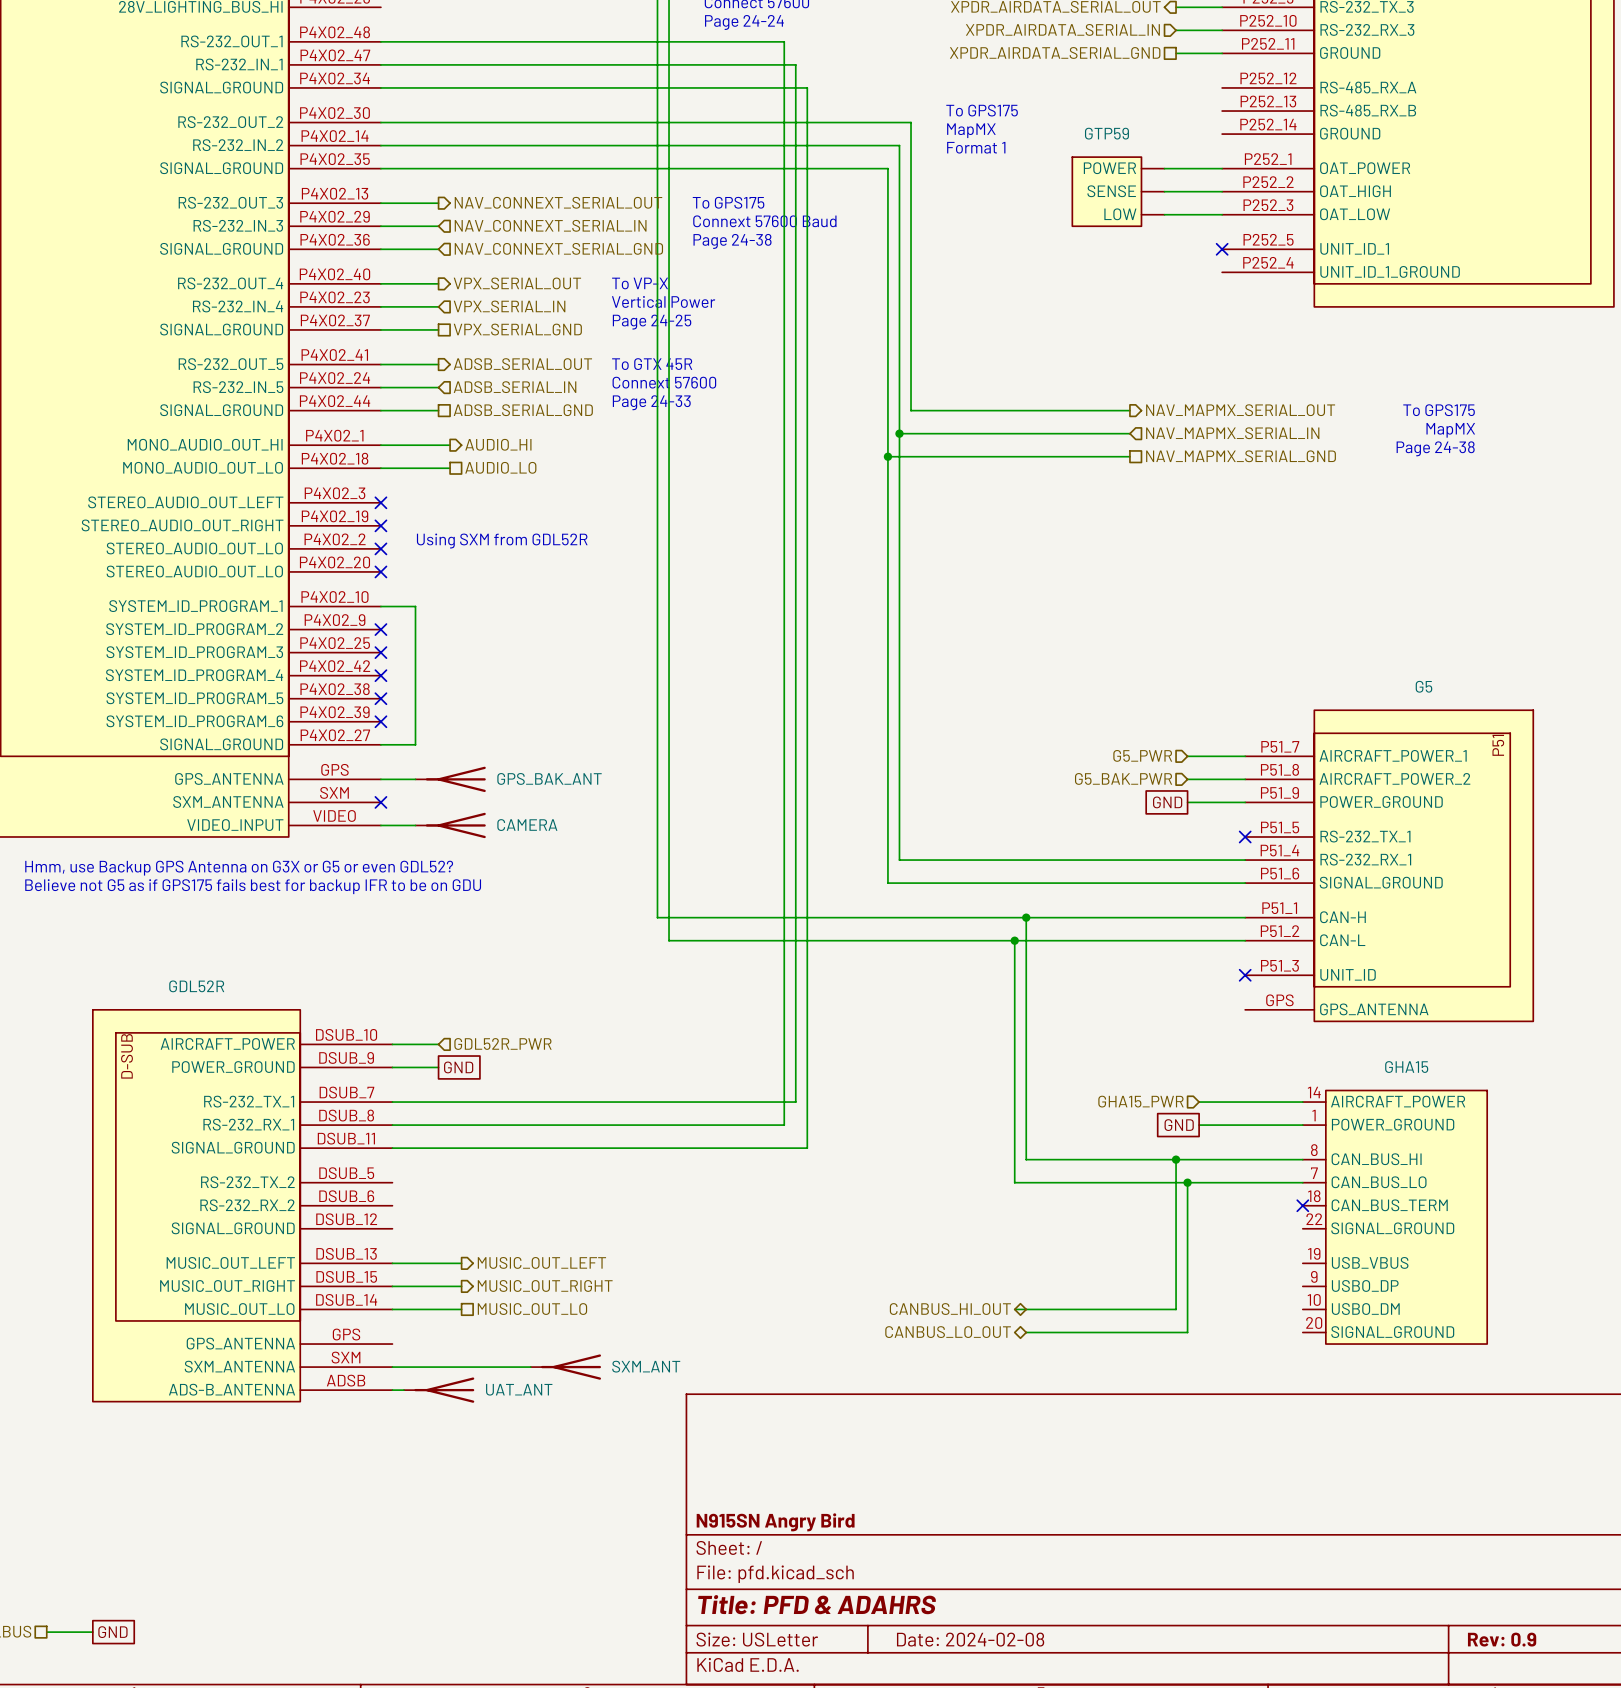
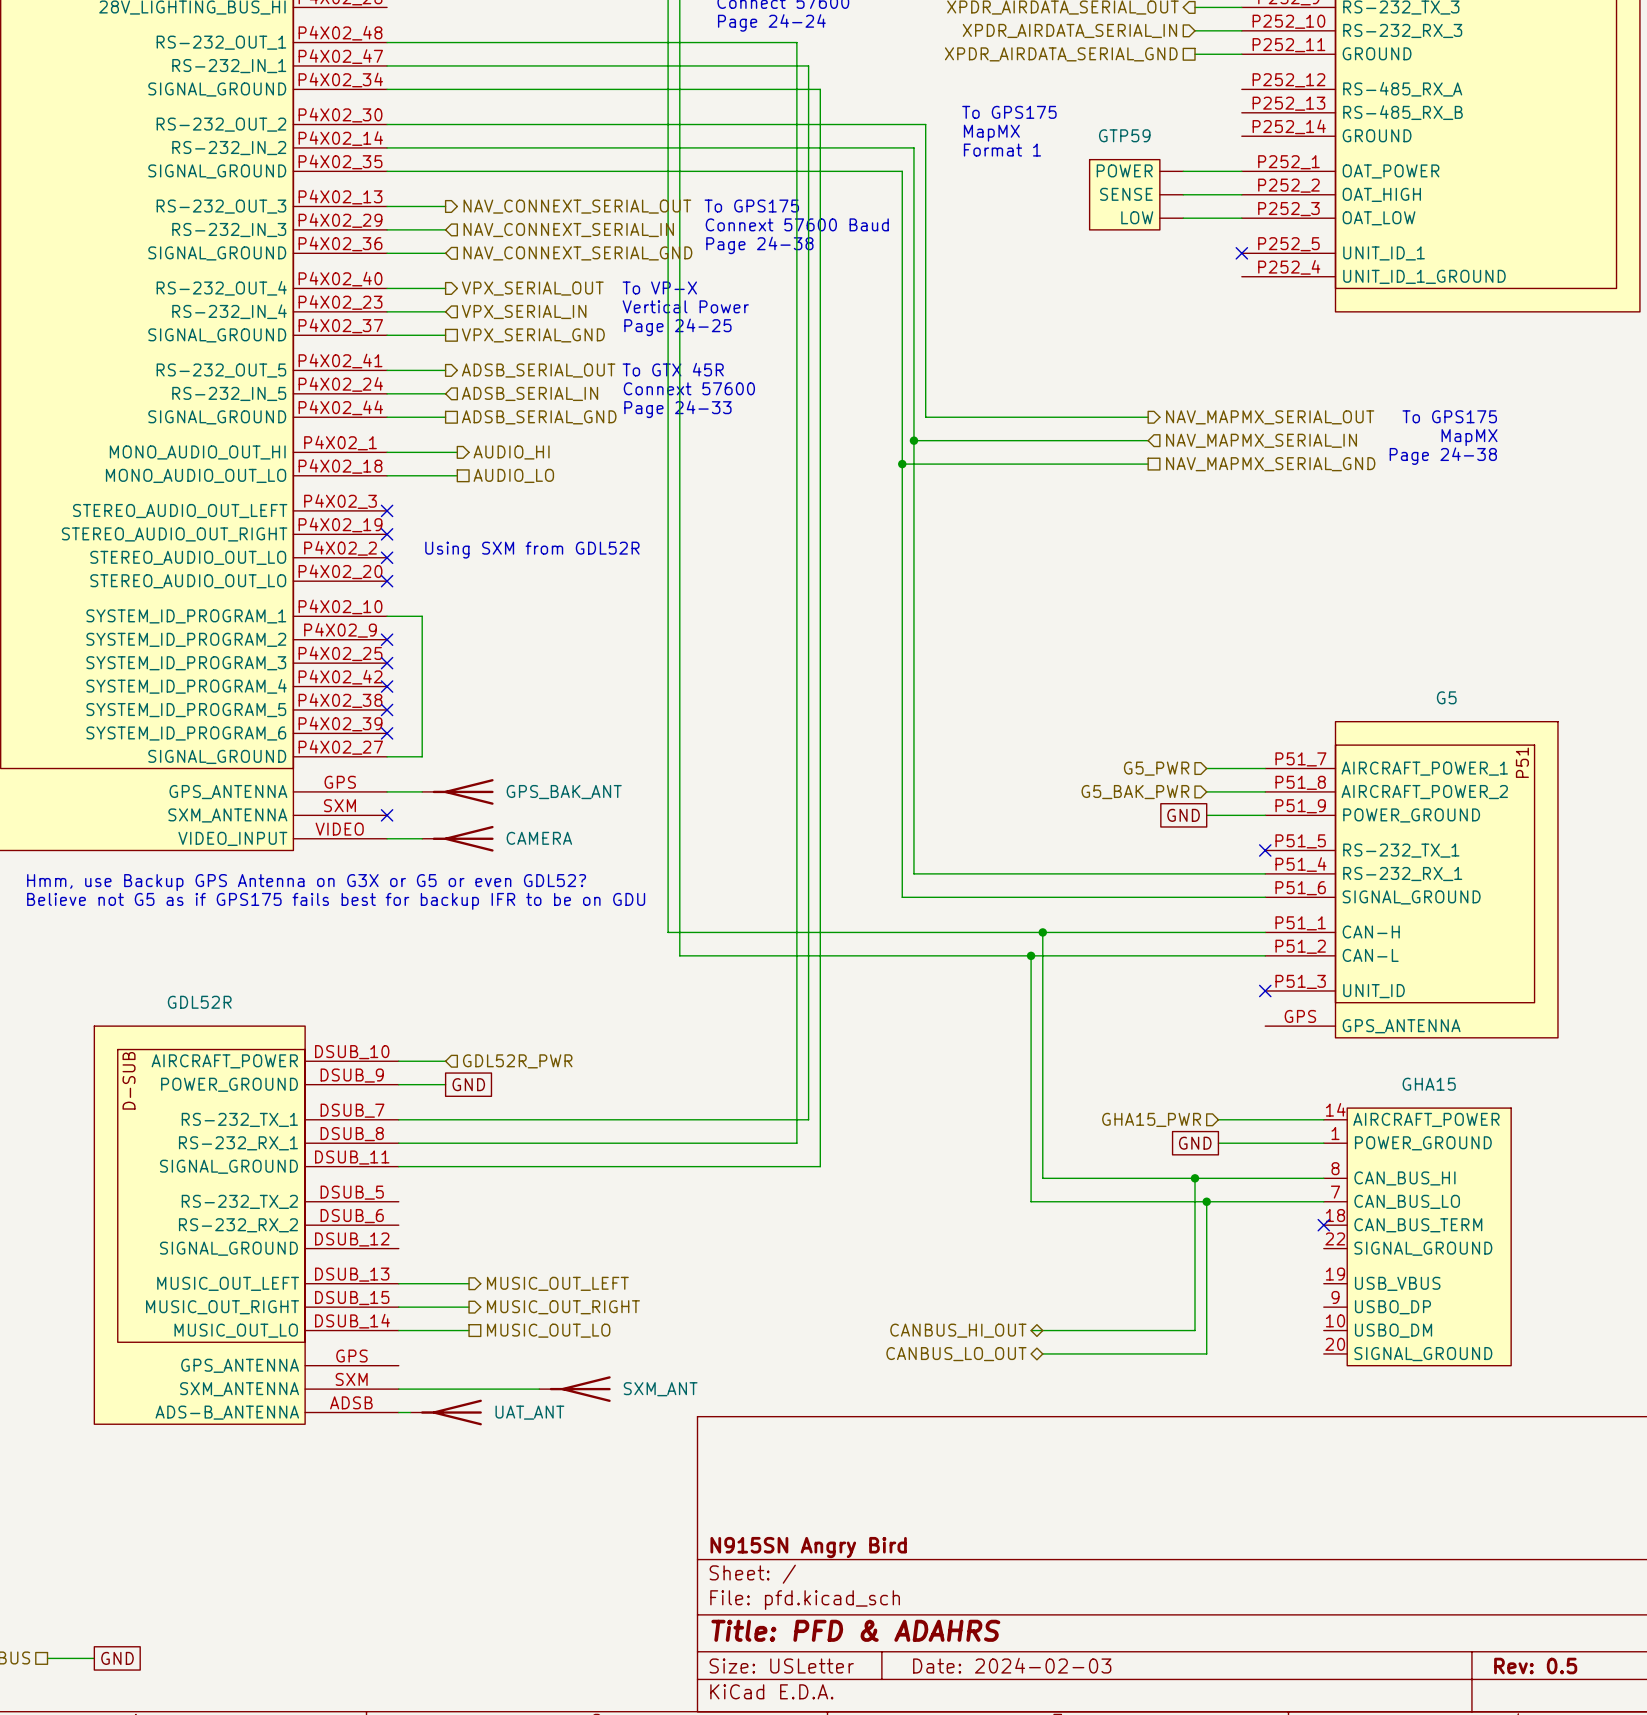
title block: Date: 2024-02-08 (970, 1639) -> Date: 2024-02-03 (1012, 1665)
title block: Rev: 0.9 (1502, 1639) -> Rev: 0.5 (1535, 1666)

